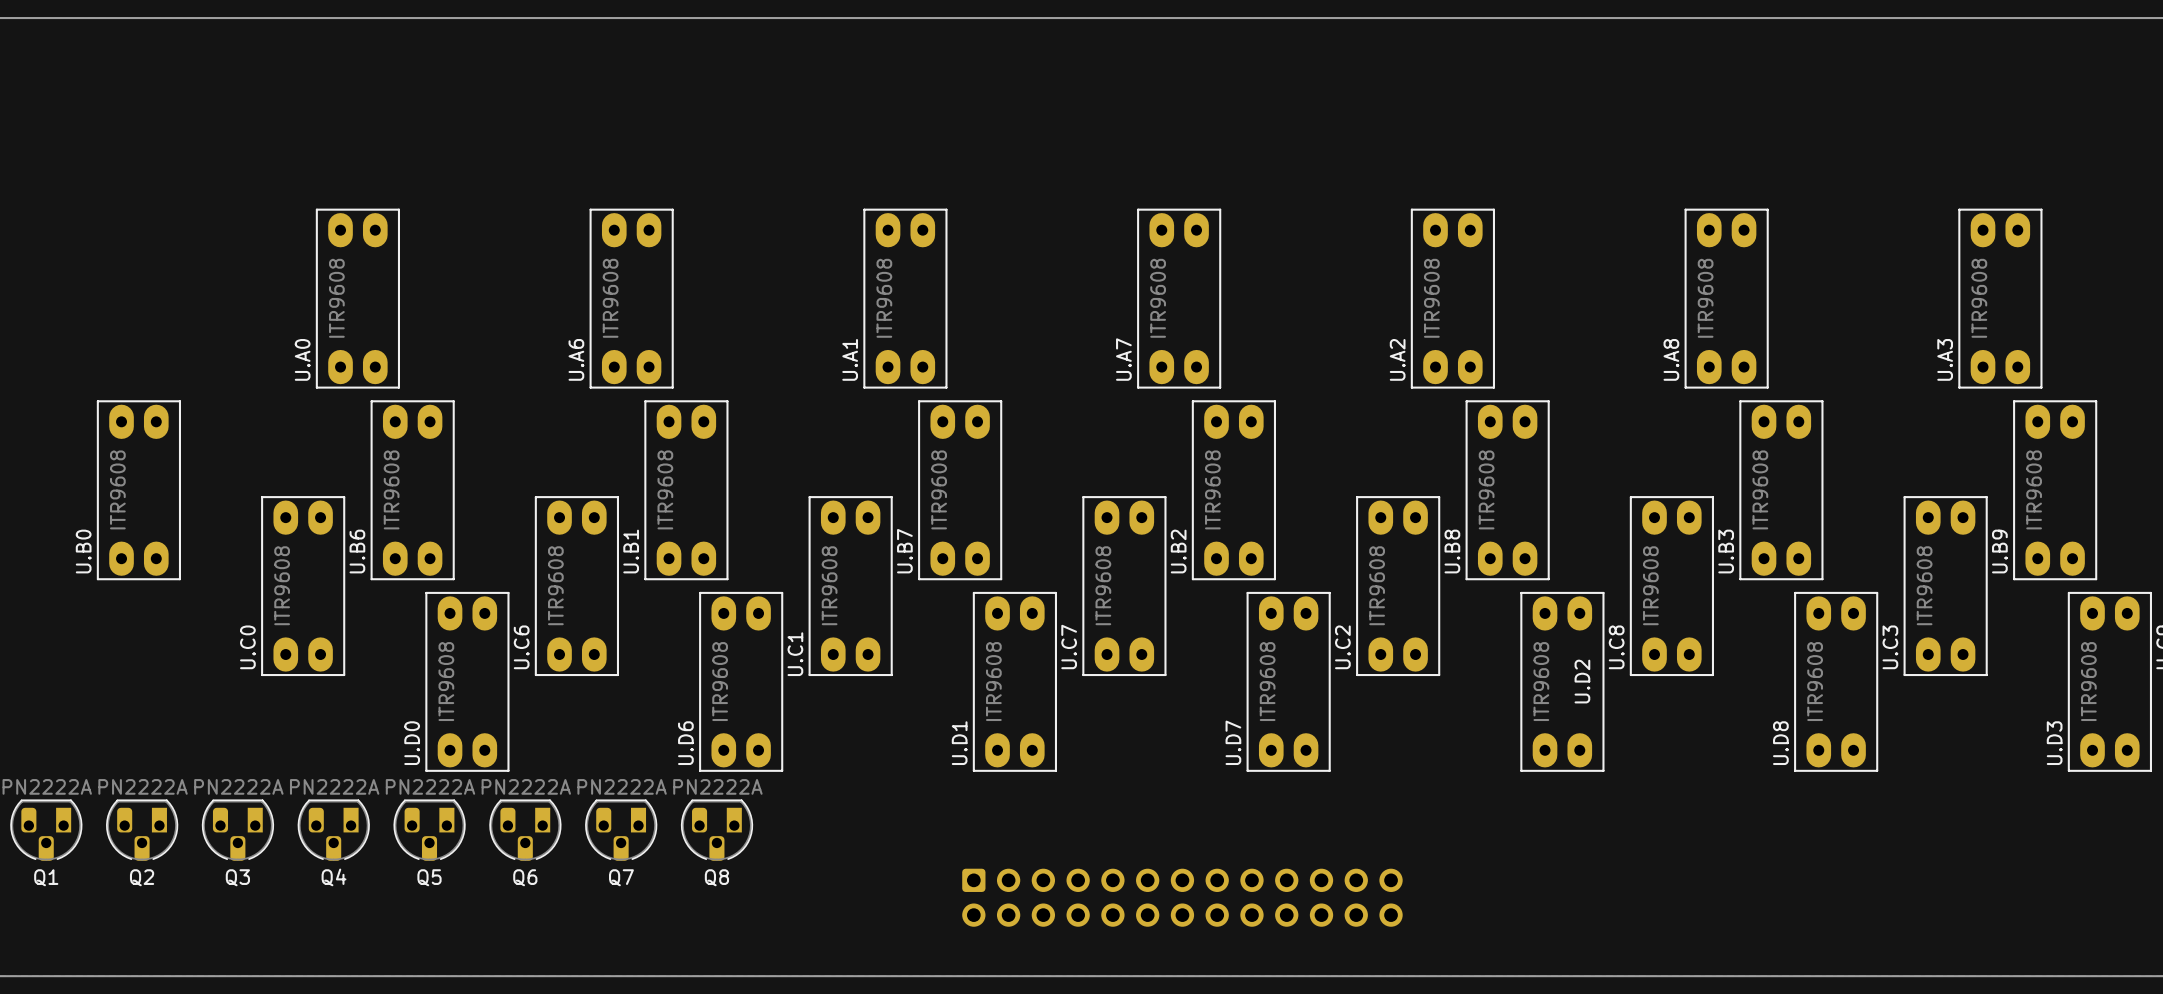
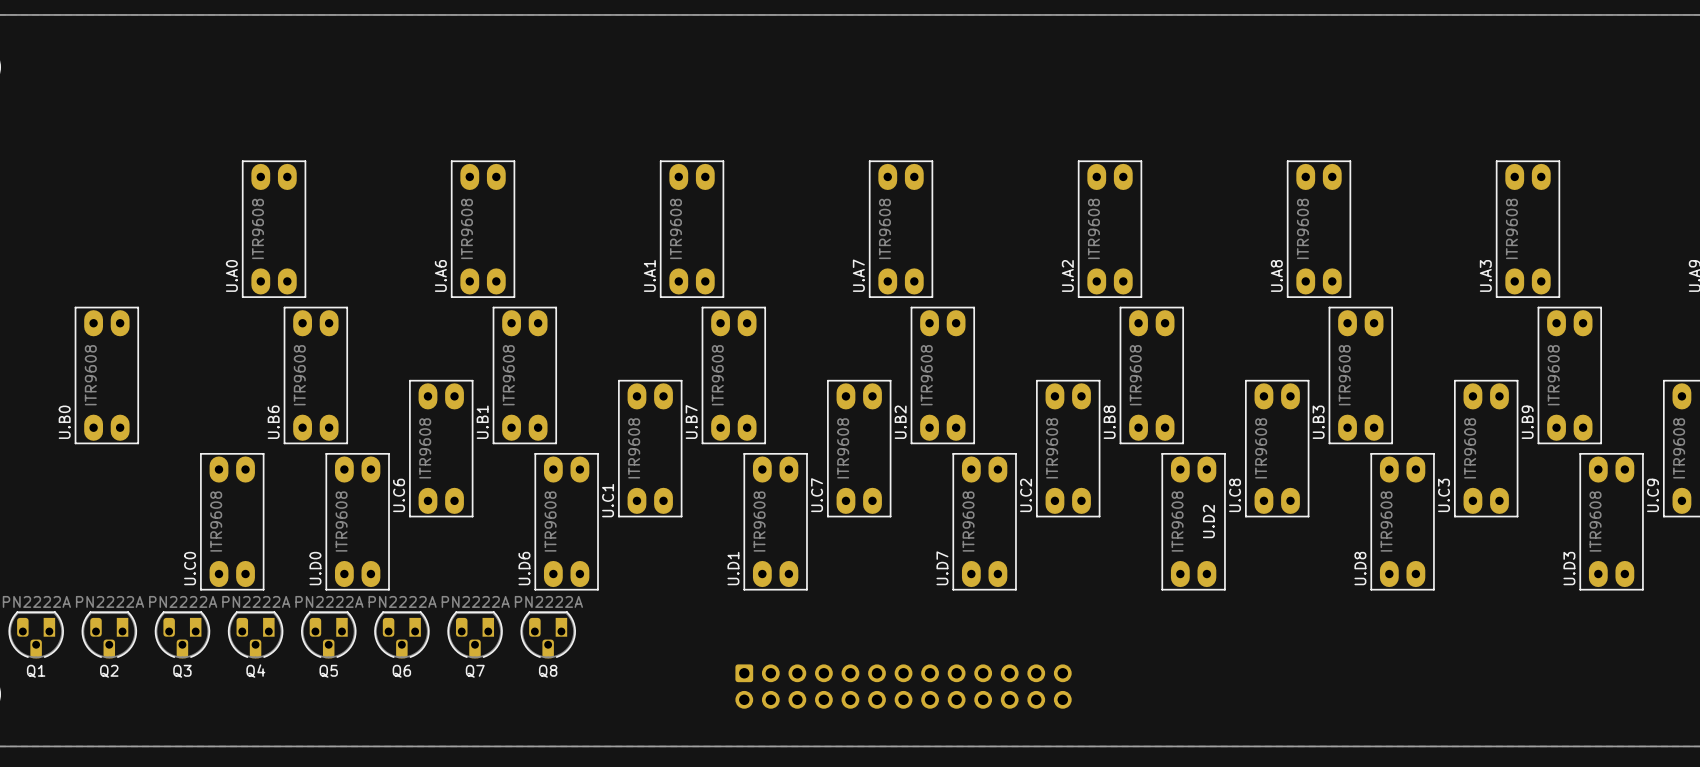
U.C0 position: (303, 586) -> (232, 521)

